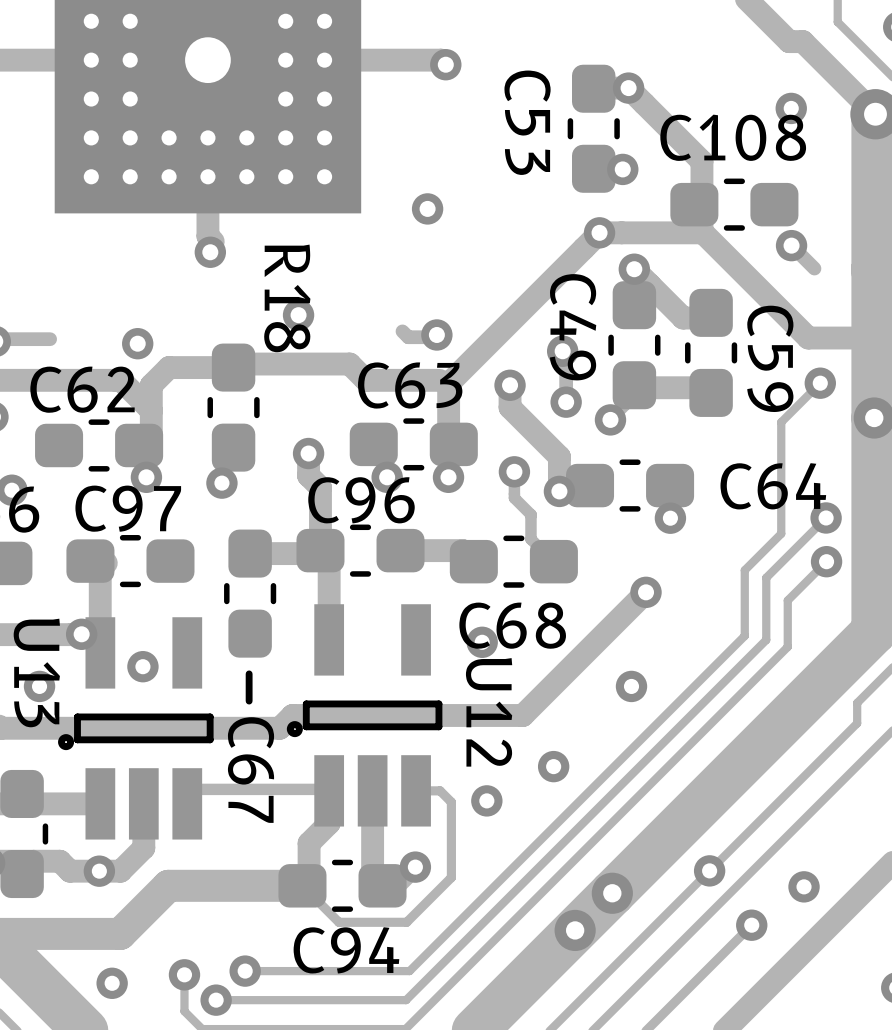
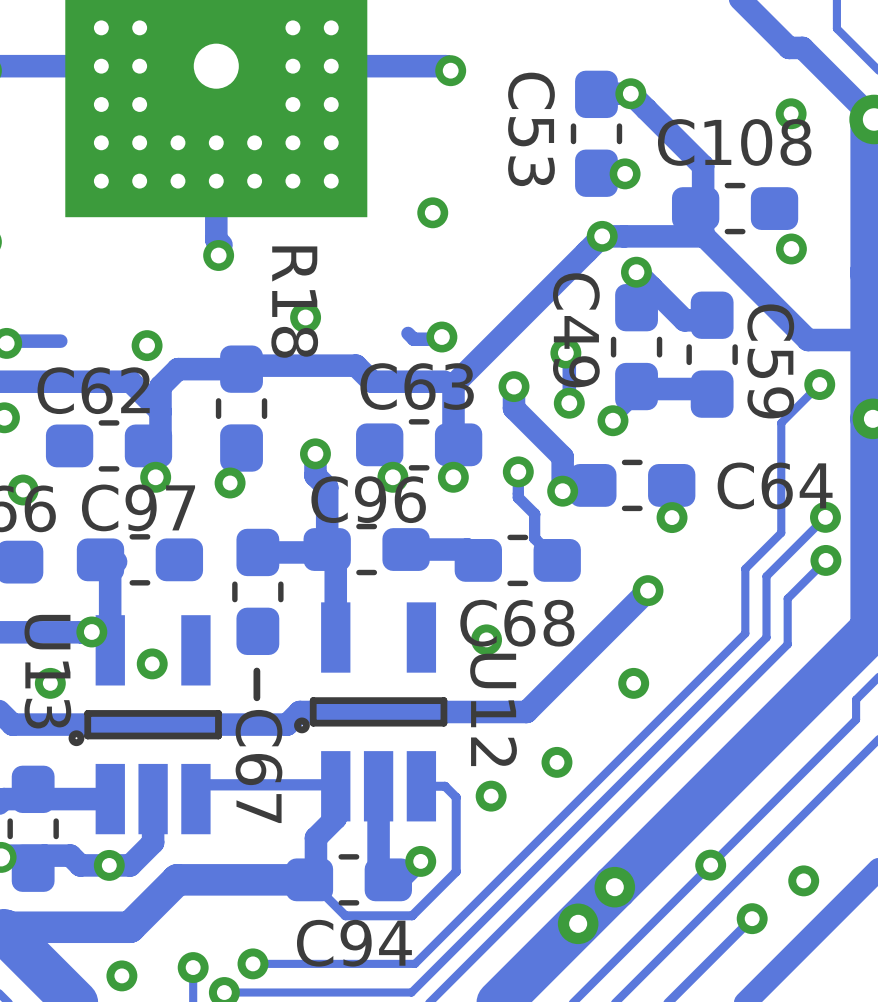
track: (791, 245) (814, 268) -> none

